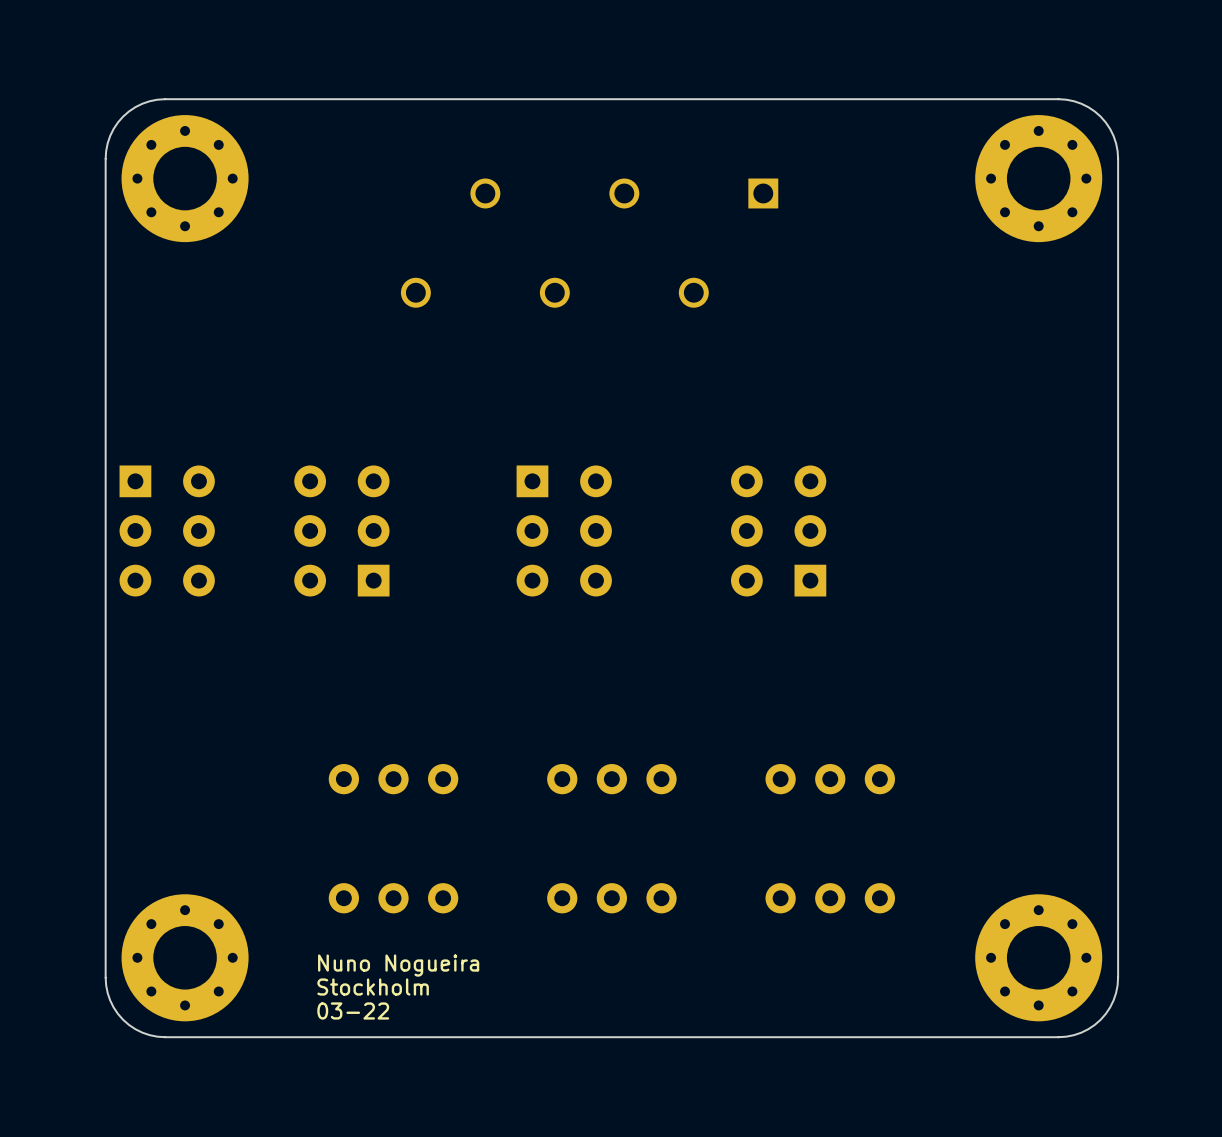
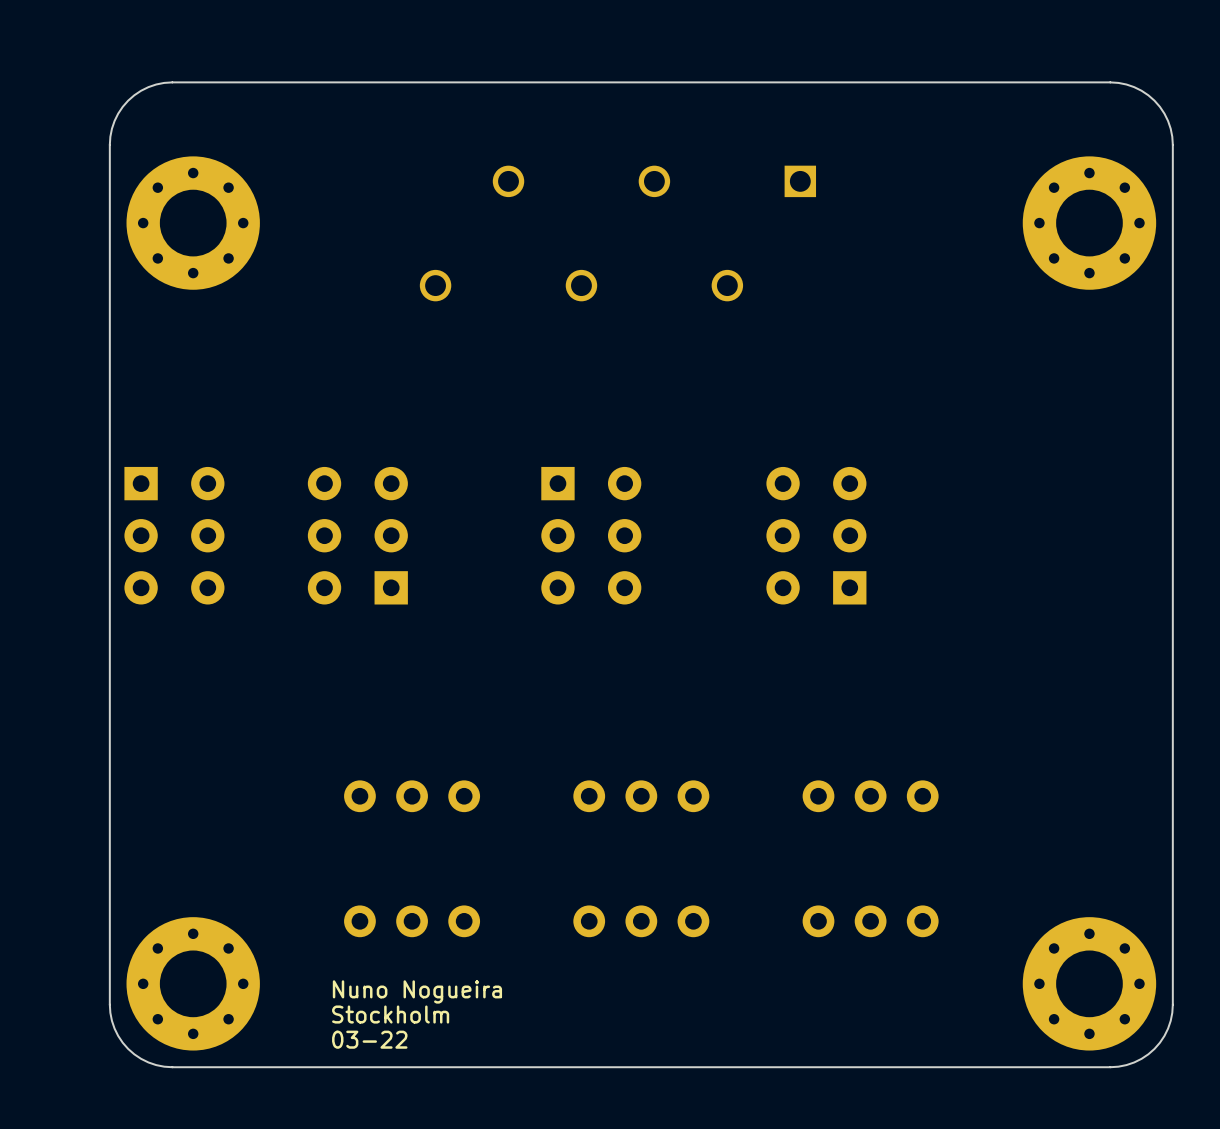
part position: (185, 178) -> (193, 223)
part position: (1038, 178) -> (1089, 223)

